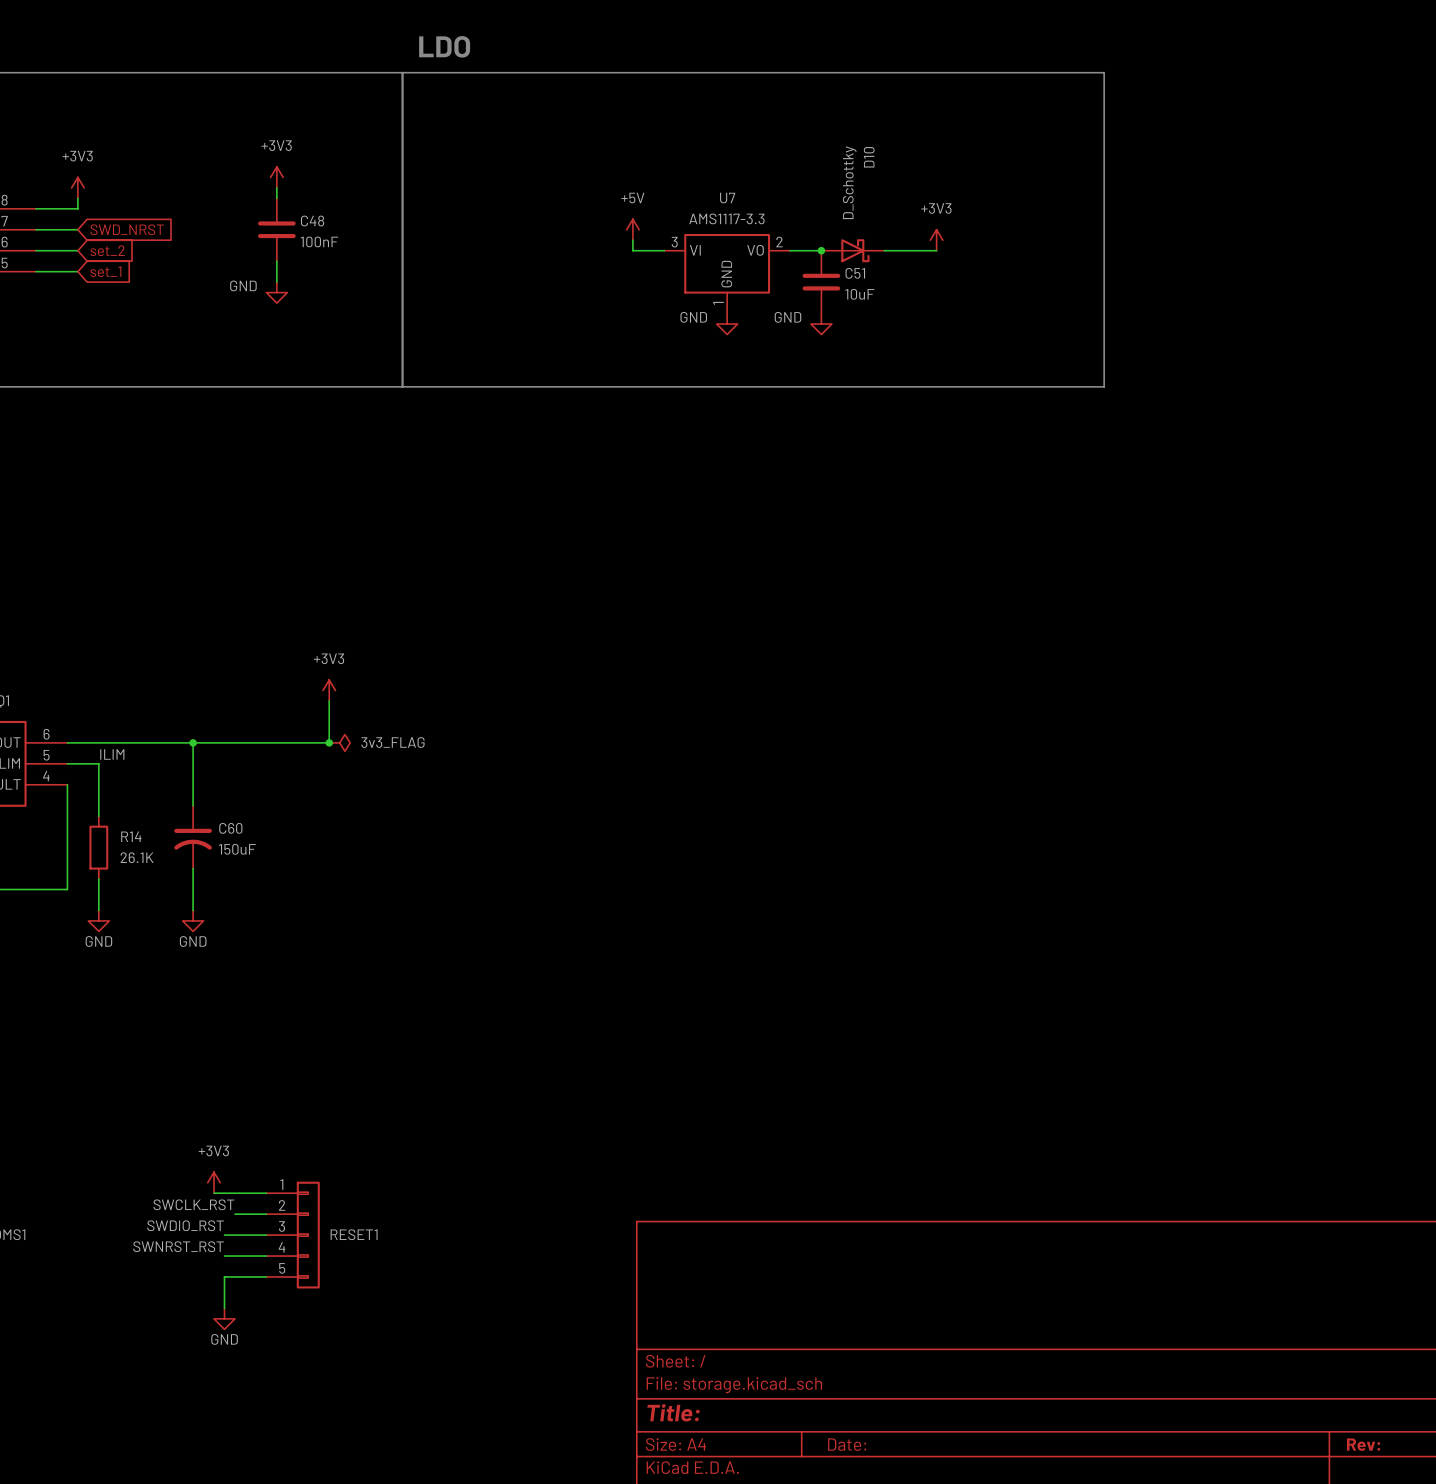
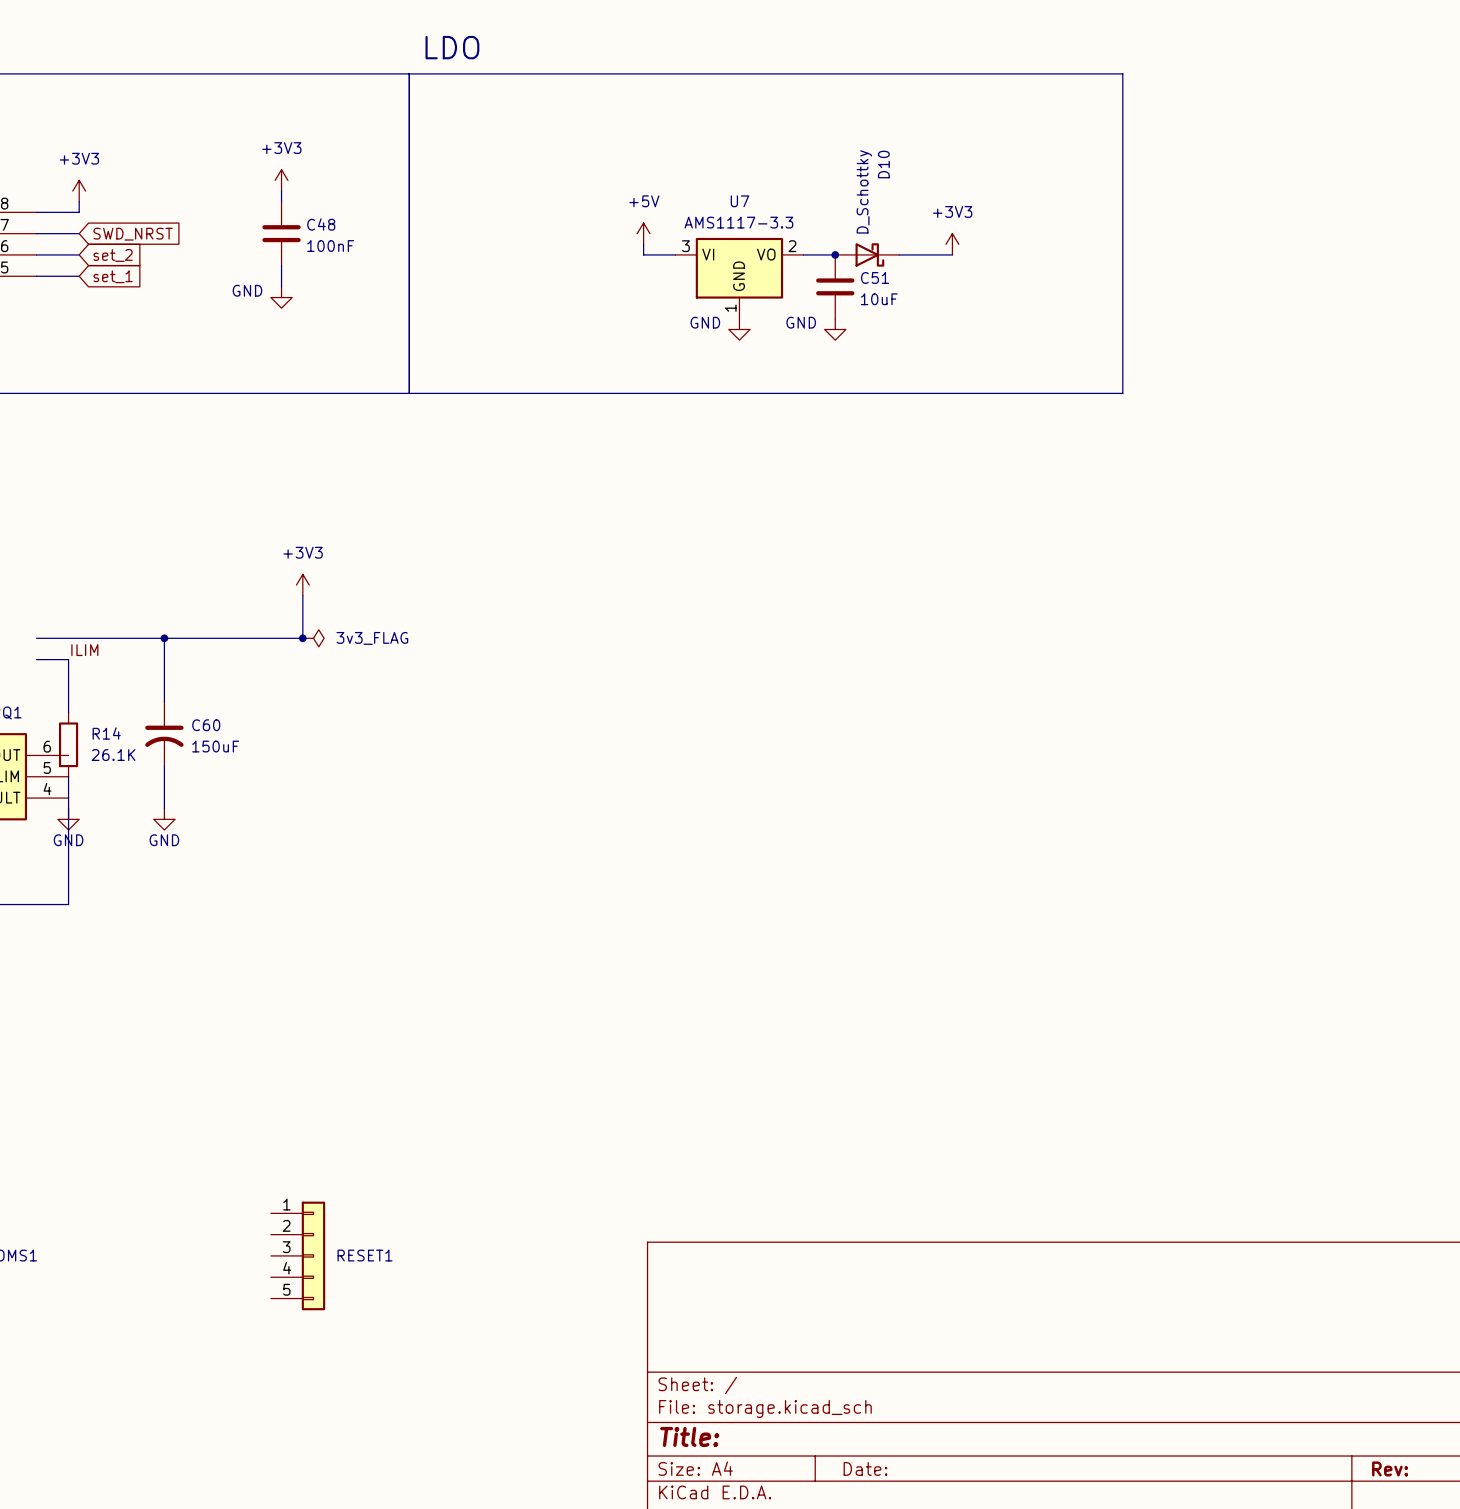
junction: none -> (164, 638)
junction: none -> (302, 638)
wire: none -> (36, 659) (68, 659) (68, 712)
power symbol position: +3V3 (329, 690) -> +3V3 (302, 585)
wire: (329, 701) (329, 742) (67, 742) -> (302, 595) (302, 638) (36, 638)
wire: (193, 742) (193, 805) -> (164, 638) (164, 702)
junction: (193, 742) -> none
junction: (329, 742) -> none
power symbol position: 3v3_FLAG (339, 742) -> 3v3_FLAG (313, 638)
label position: ILIM (112, 754) -> ILIM (84, 650)
wire: (67, 763) (98, 763) (98, 816) -> (68, 776) (68, 798)
power symbol: none -> GND (68, 819)
power symbol: none -> GND (164, 819)
C60 position: (193, 837) -> (164, 734)
R14 position: (98, 847) -> (68, 744)
wire: (193, 868) (193, 910) -> (164, 766) (164, 808)
wire: (98, 879) (98, 910) -> none
power symbol: GND (98, 920) -> none
power symbol: GND (193, 920) -> none
power symbol: +3V3 (214, 1182) -> none
wire: (214, 1193) (266, 1193) -> none
label: SWCLK_RST (193, 1204) -> none
wire: (234, 1214) (266, 1214) -> none
label: SWDIO_RST (185, 1225) -> none
wire: (224, 1235) (266, 1235) -> none
label: SWNRST_RST (178, 1246) -> none
wire: (224, 1256) (266, 1256) -> none
wire: (266, 1276) (224, 1276) (224, 1308) -> none
power symbol: GND (224, 1318) -> none

